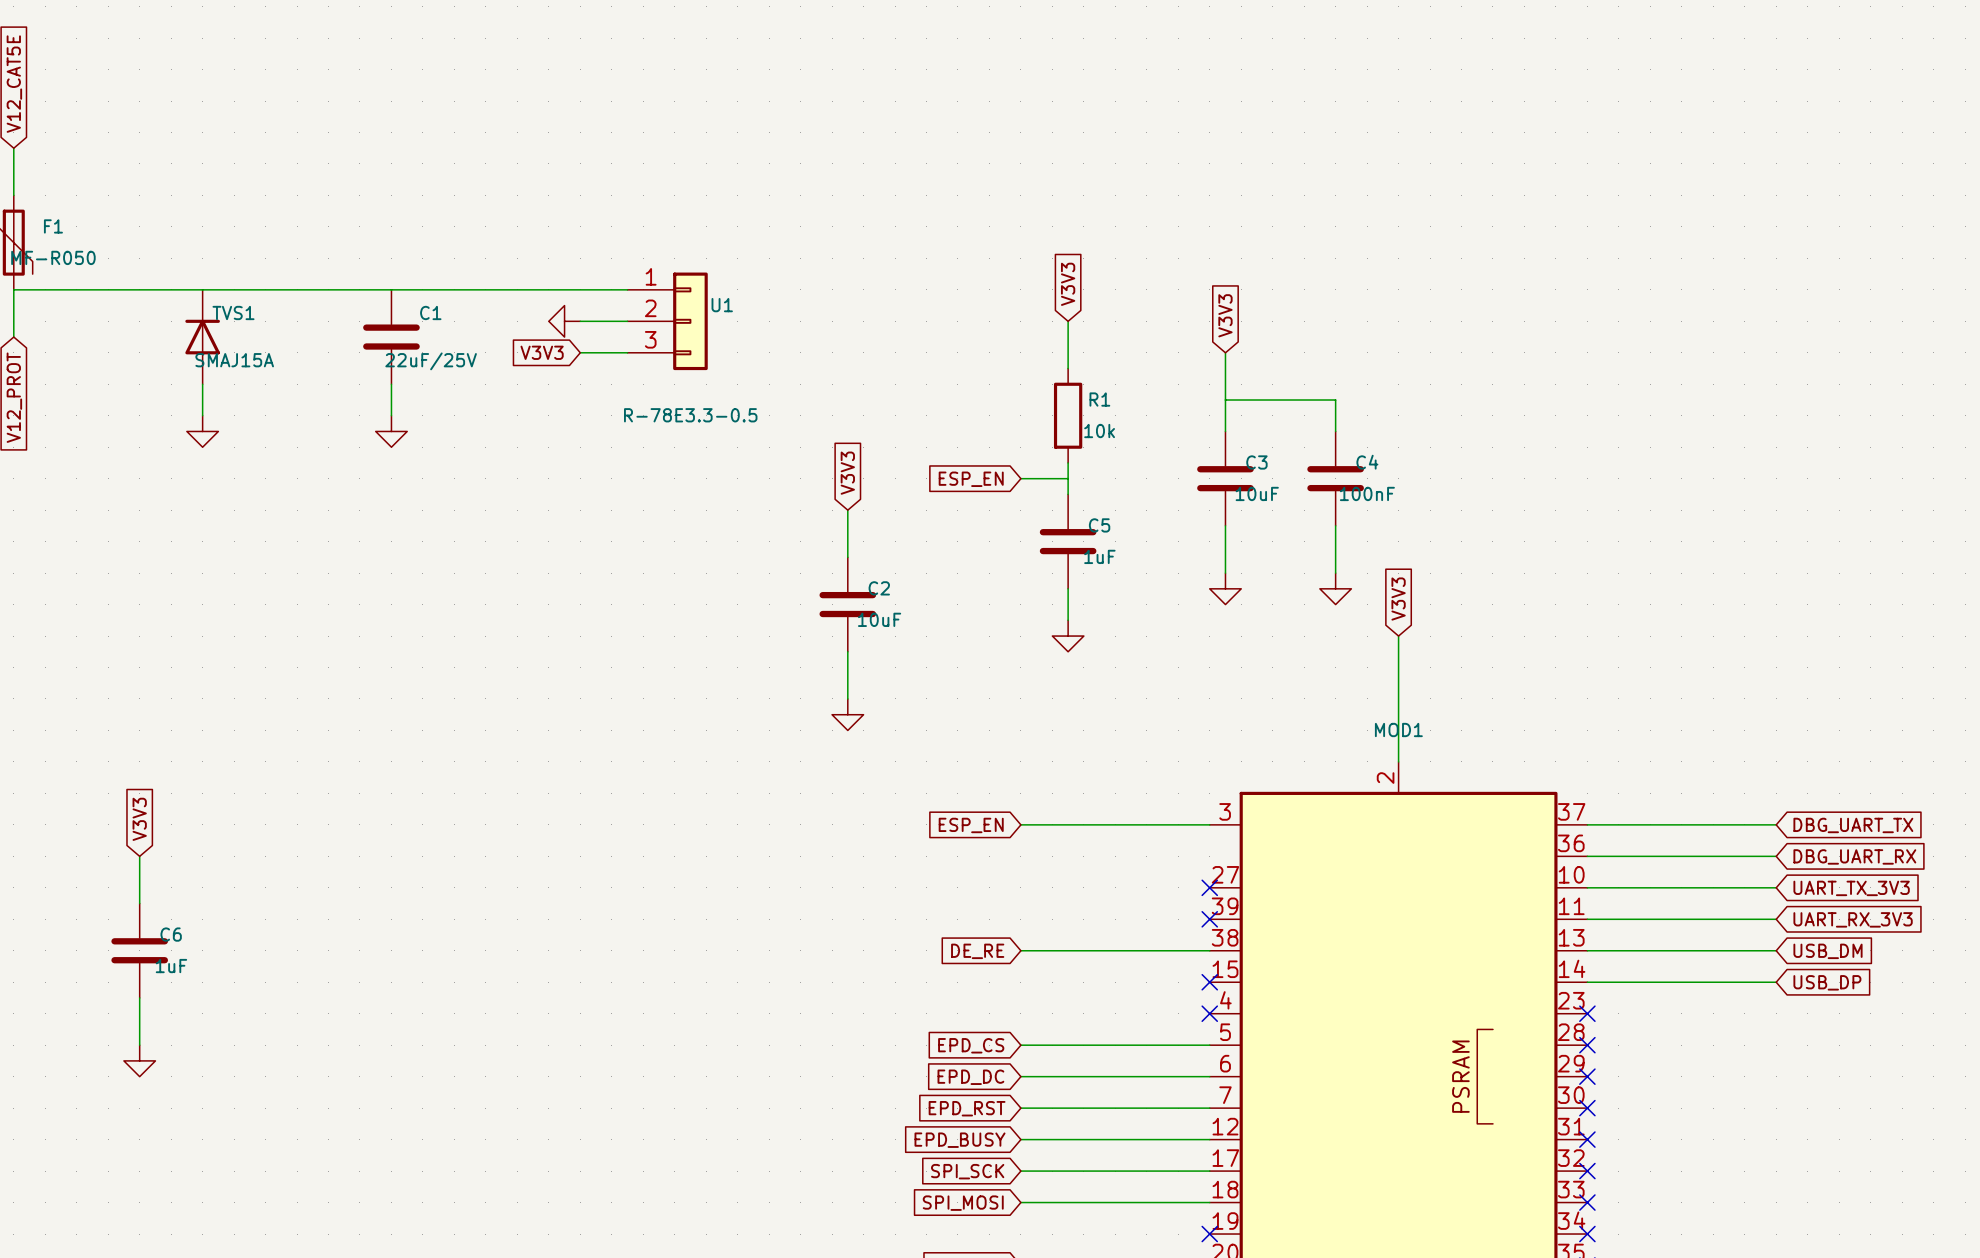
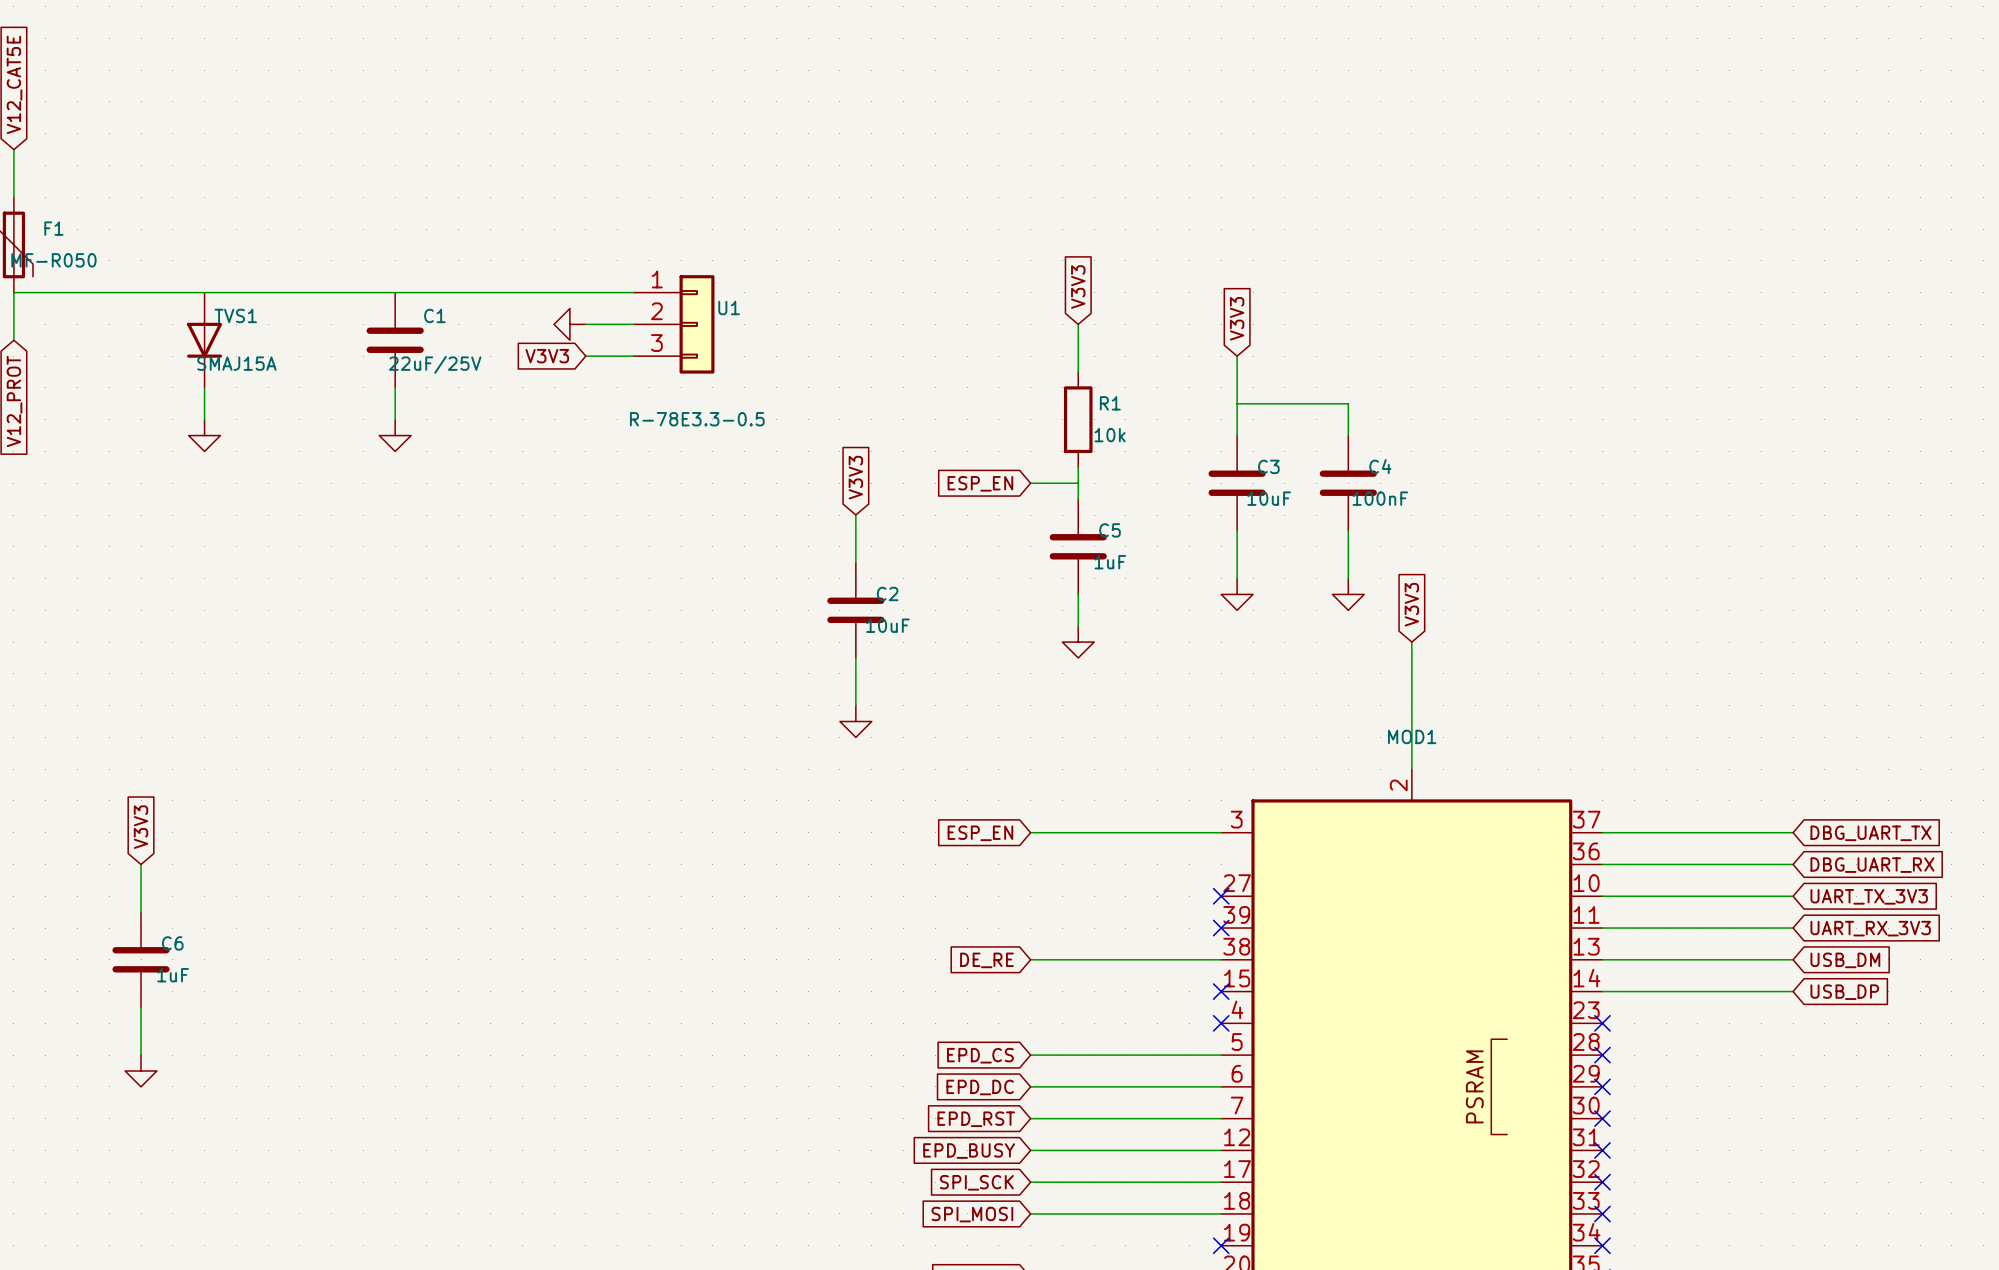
TVS1 rotation: 0° (202, 337) -> 180° (204, 340)

